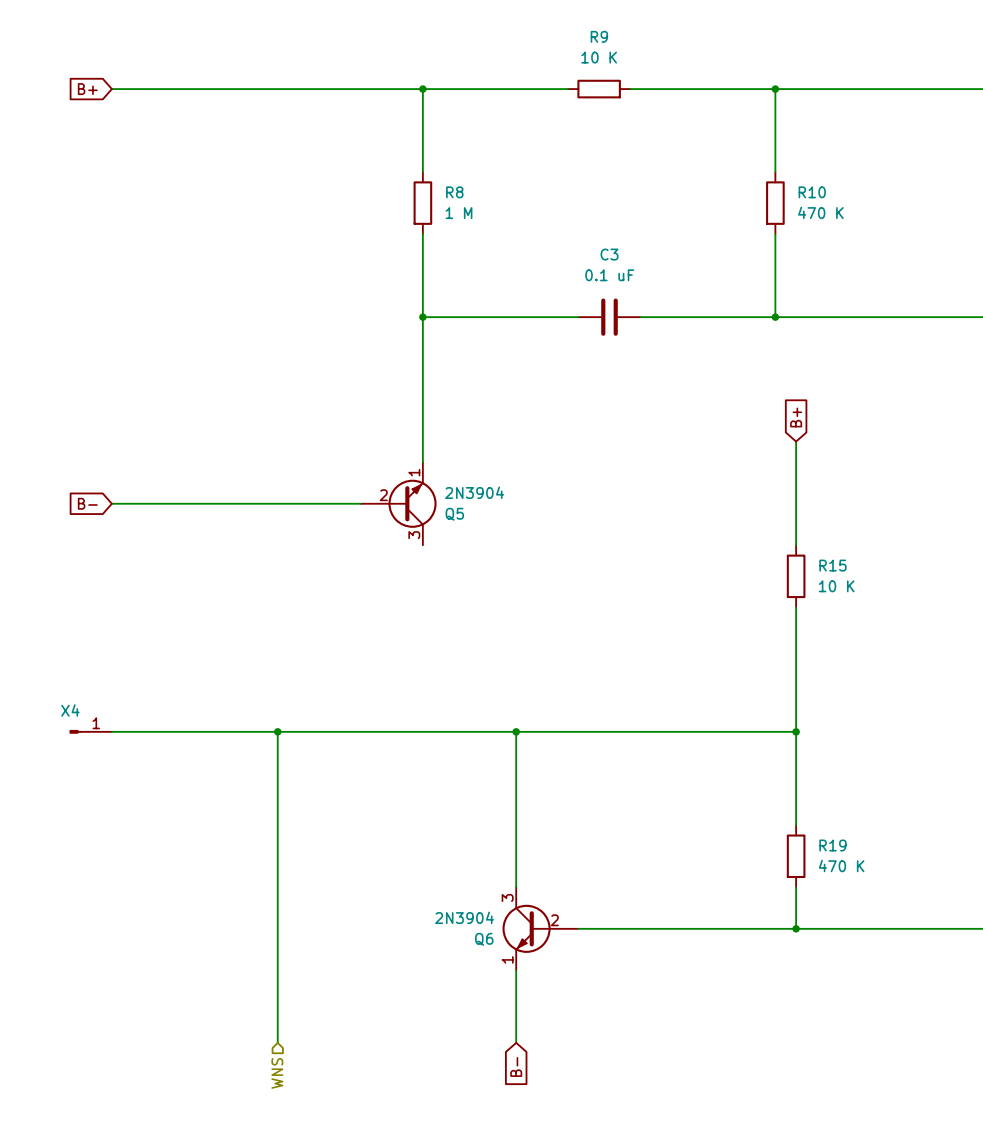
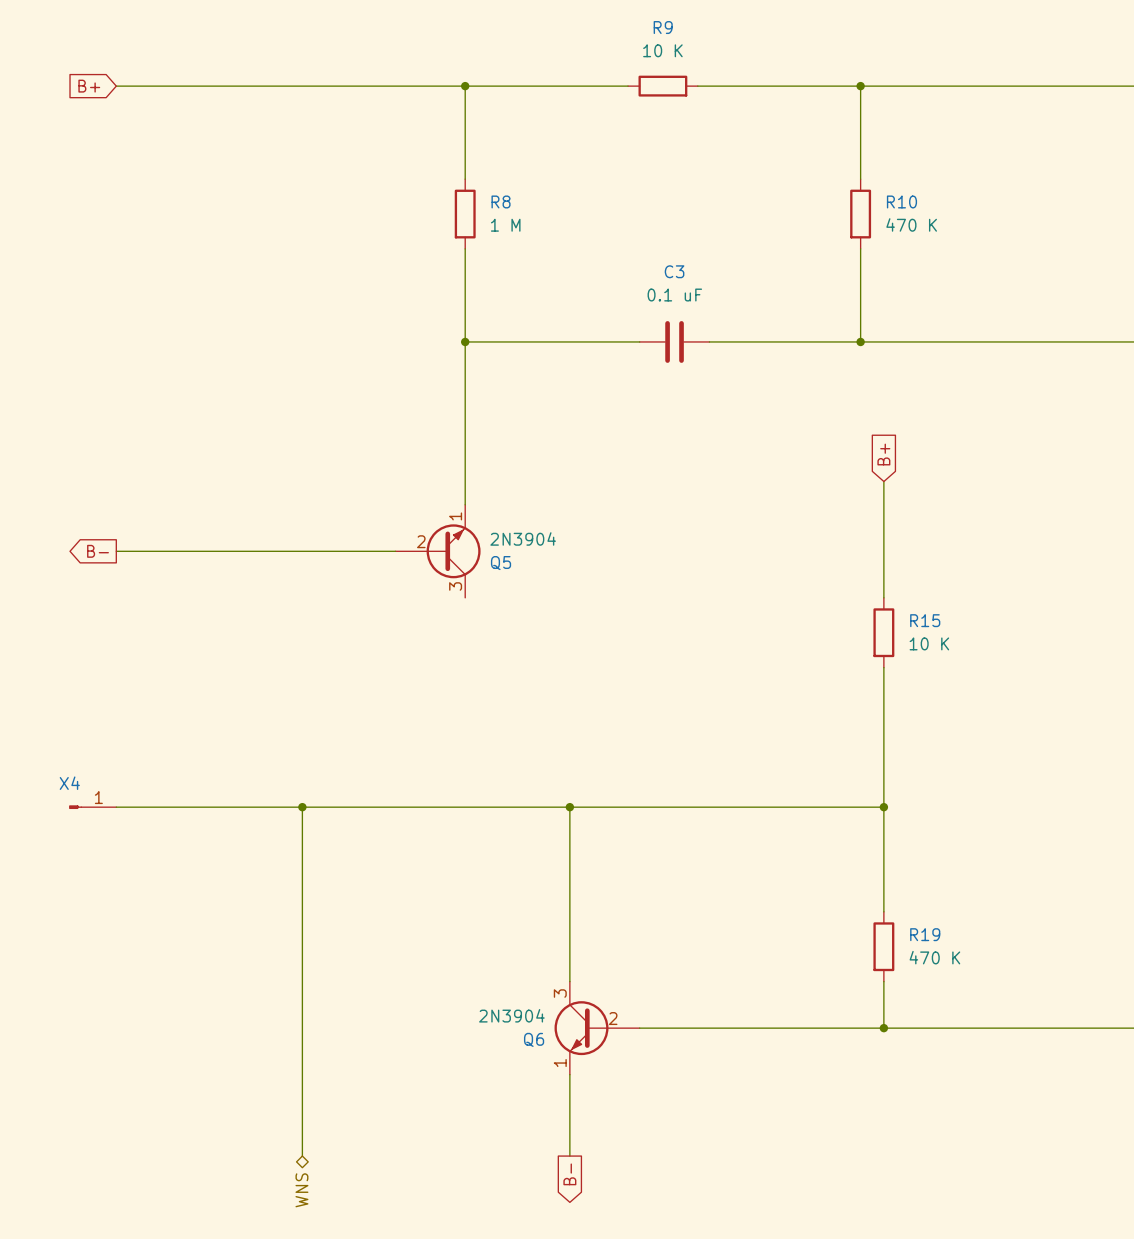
global label shape: input (87, 503) -> output (98, 551)
global label shape: input (516, 1066) -> output (569, 1174)
hierarchical label shape: input (277, 1073) -> bidirectional (301, 1190)

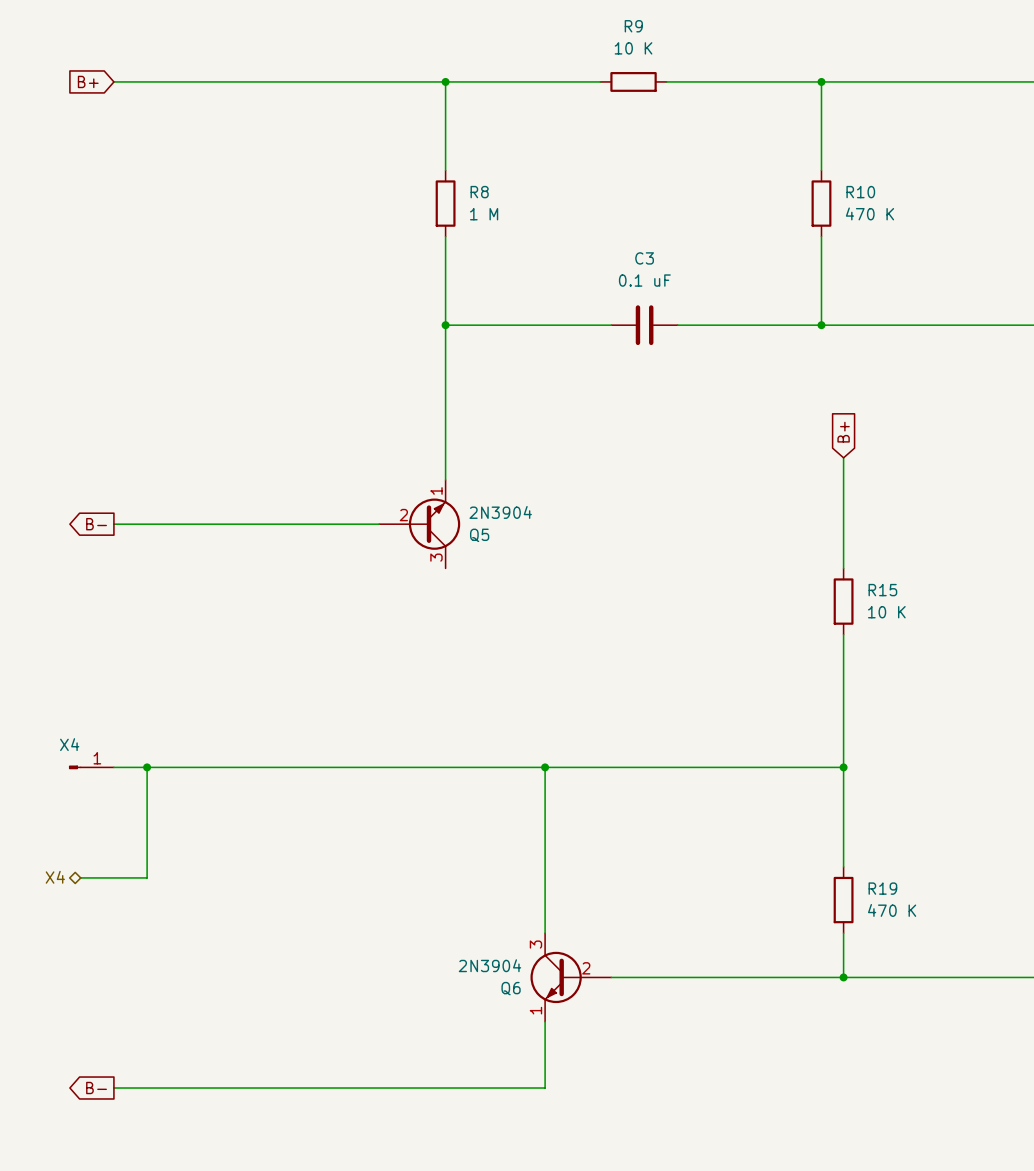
wire: none -> (147, 767) (147, 877) (80, 877)
junction: none -> (147, 767)
wire: (302, 807) (302, 1156) -> none
junction: (302, 807) -> none
hierarchical label: none -> X4 (55, 877)
global label: none -> B- (96, 1088)
wire: (569, 1144) (569, 1156) -> (545, 1088) (113, 1088)
global label: B- (569, 1174) -> none
hierarchical label: WNS (301, 1190) -> none

